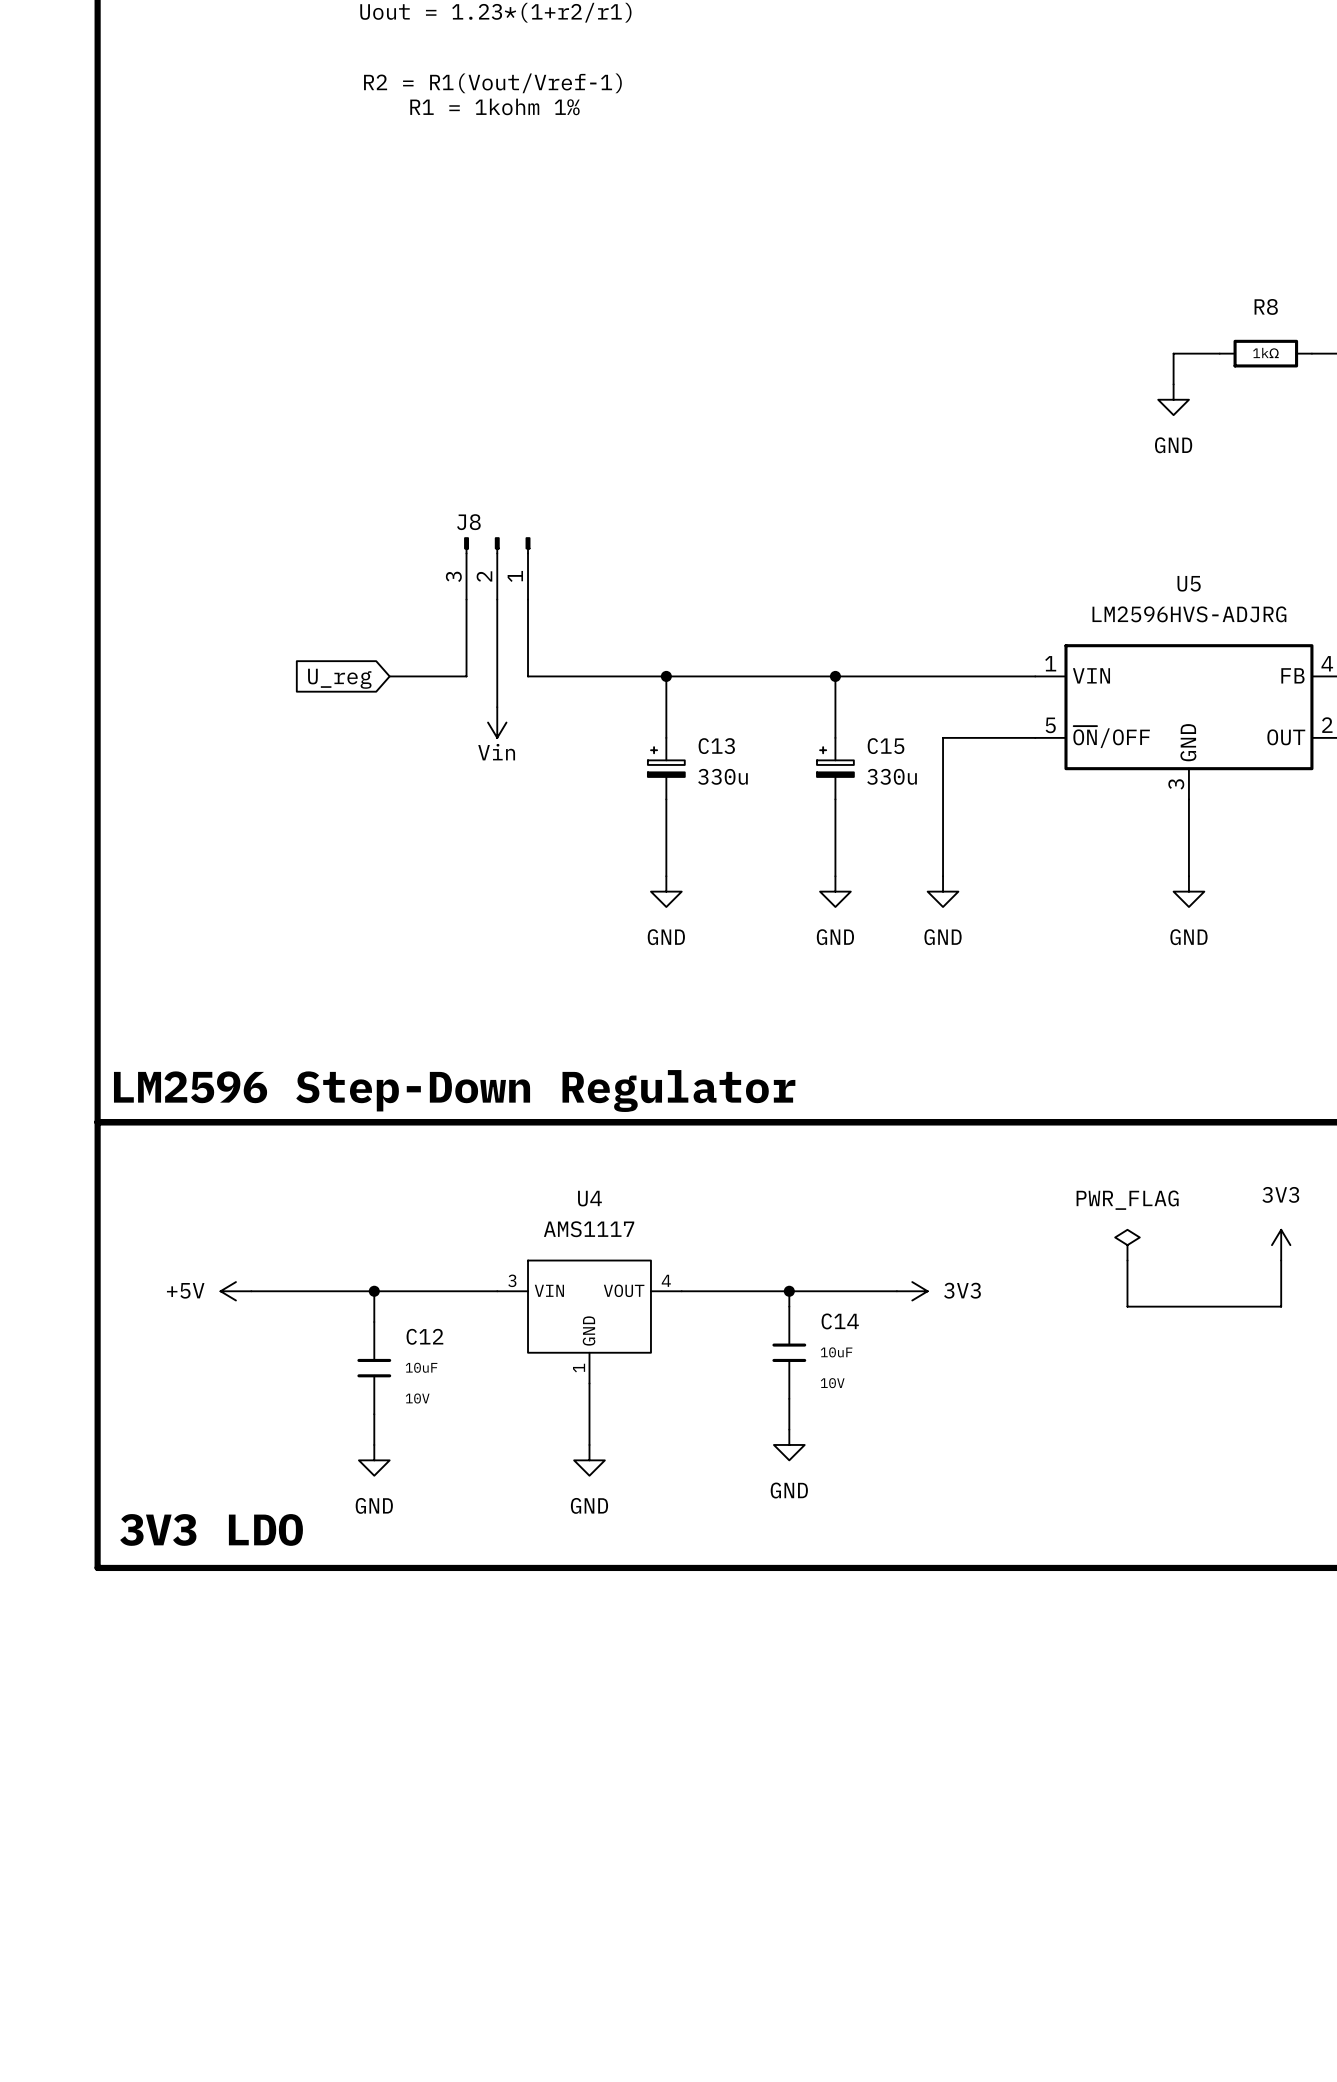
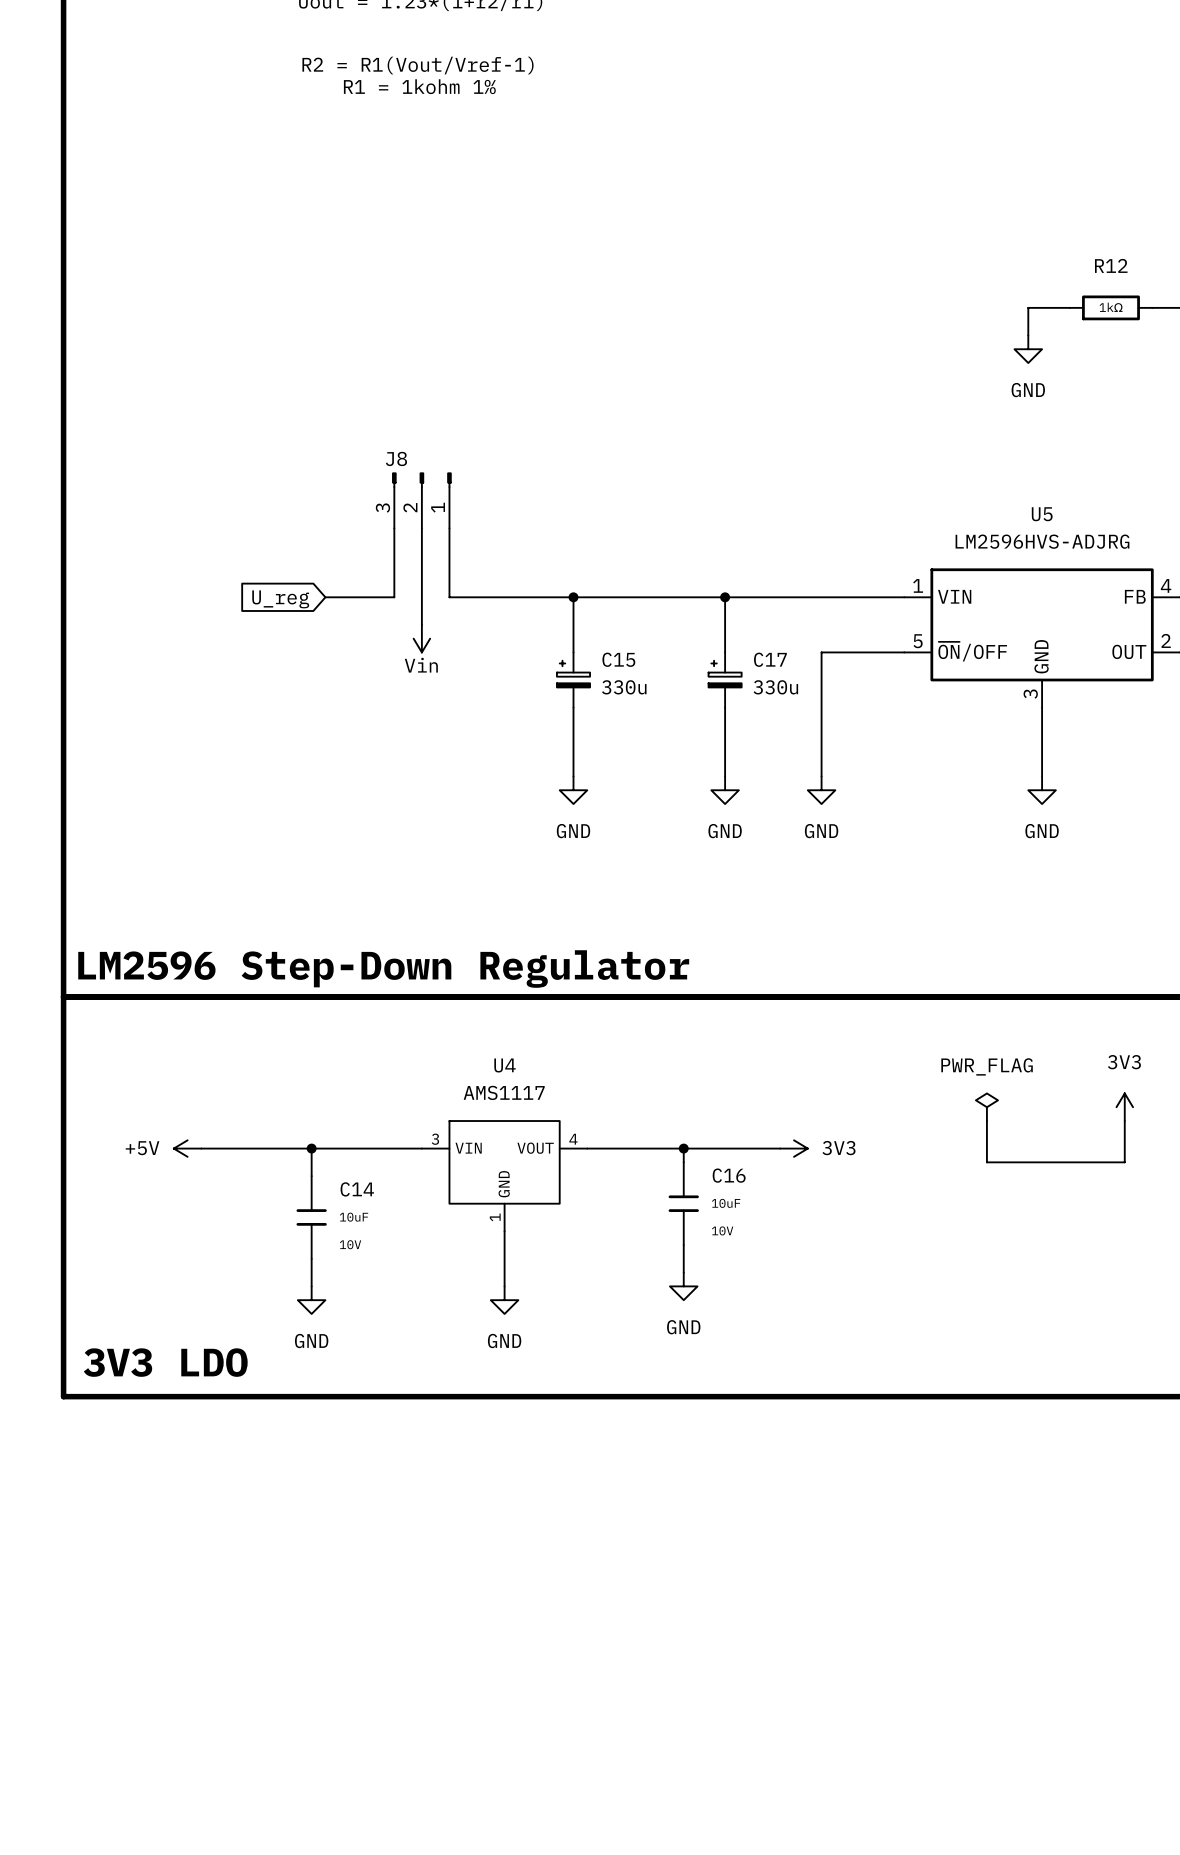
R8 name: R8 (1266, 306) -> R12 (1111, 265)
C13 name: C13 (716, 746) -> C15 (618, 659)
C15 name: C15 (886, 746) -> C17 (770, 659)
C14 name: C14 (840, 1321) -> C16 (729, 1175)
C12 name: C12 (424, 1336) -> C14 (357, 1189)

